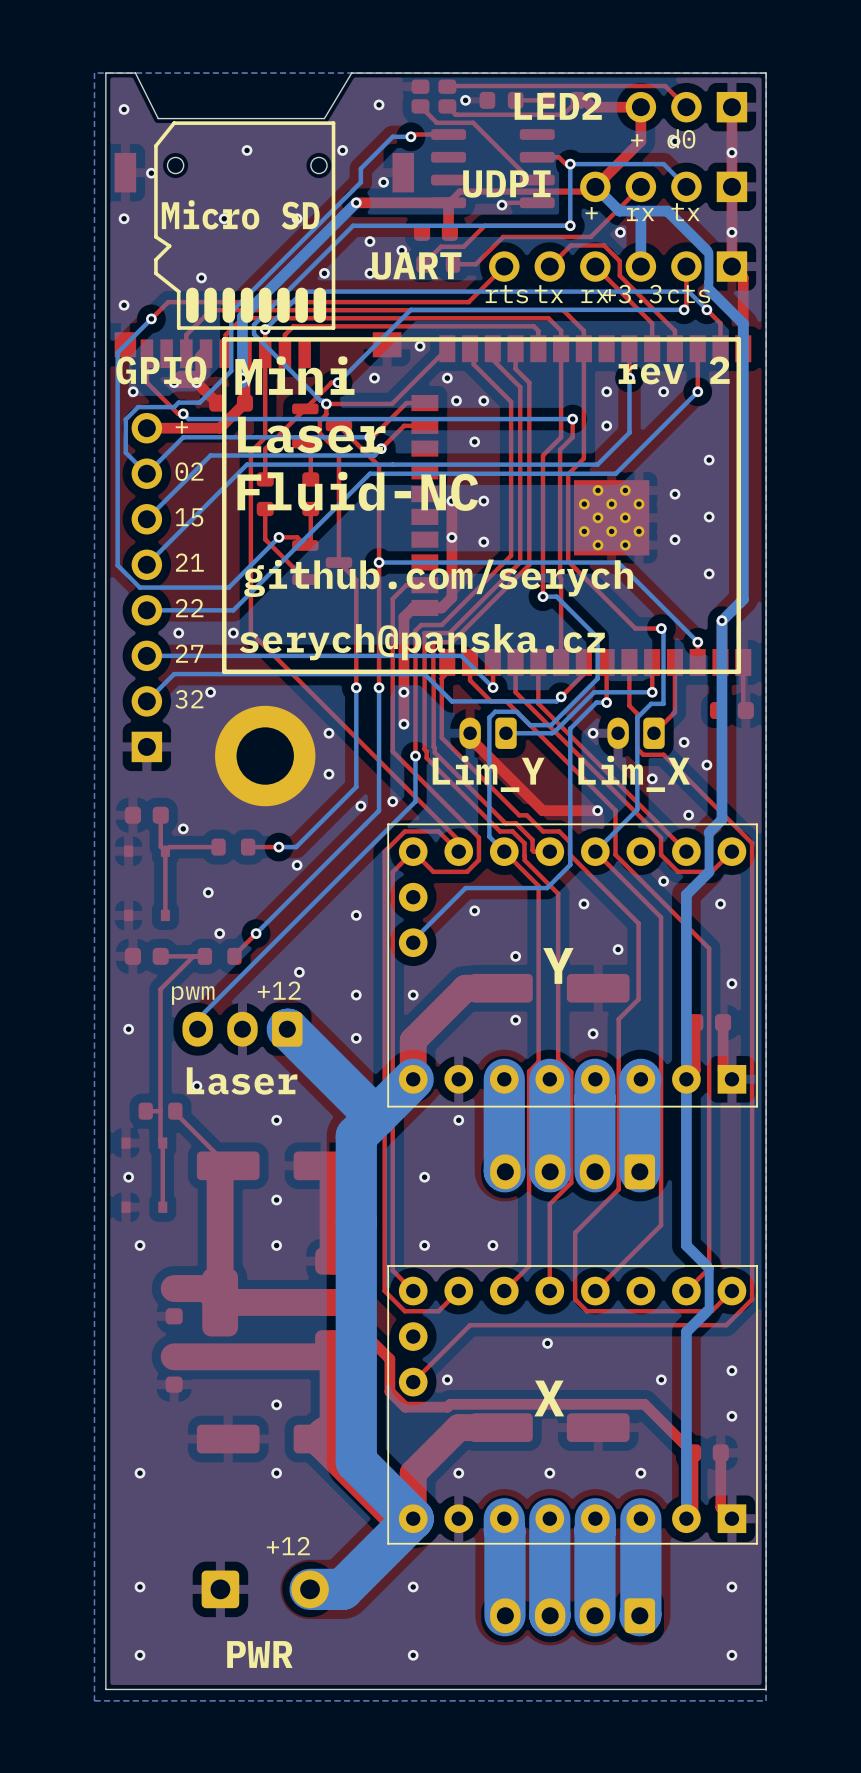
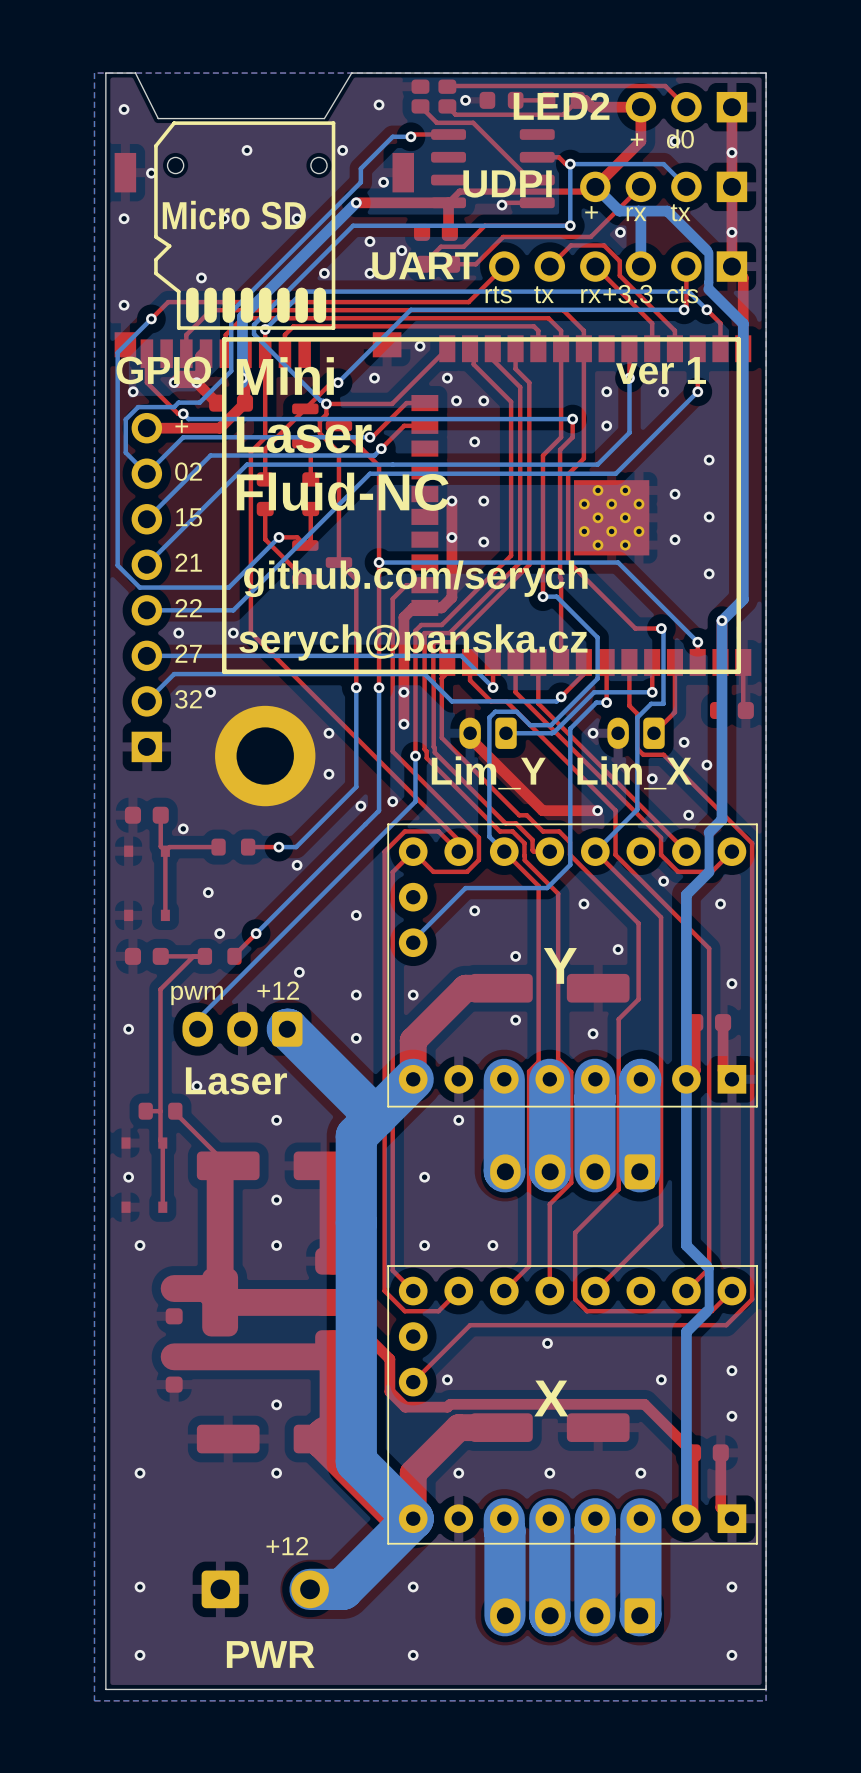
text: rev 2 (674, 370) -> ver 1 (661, 370)

